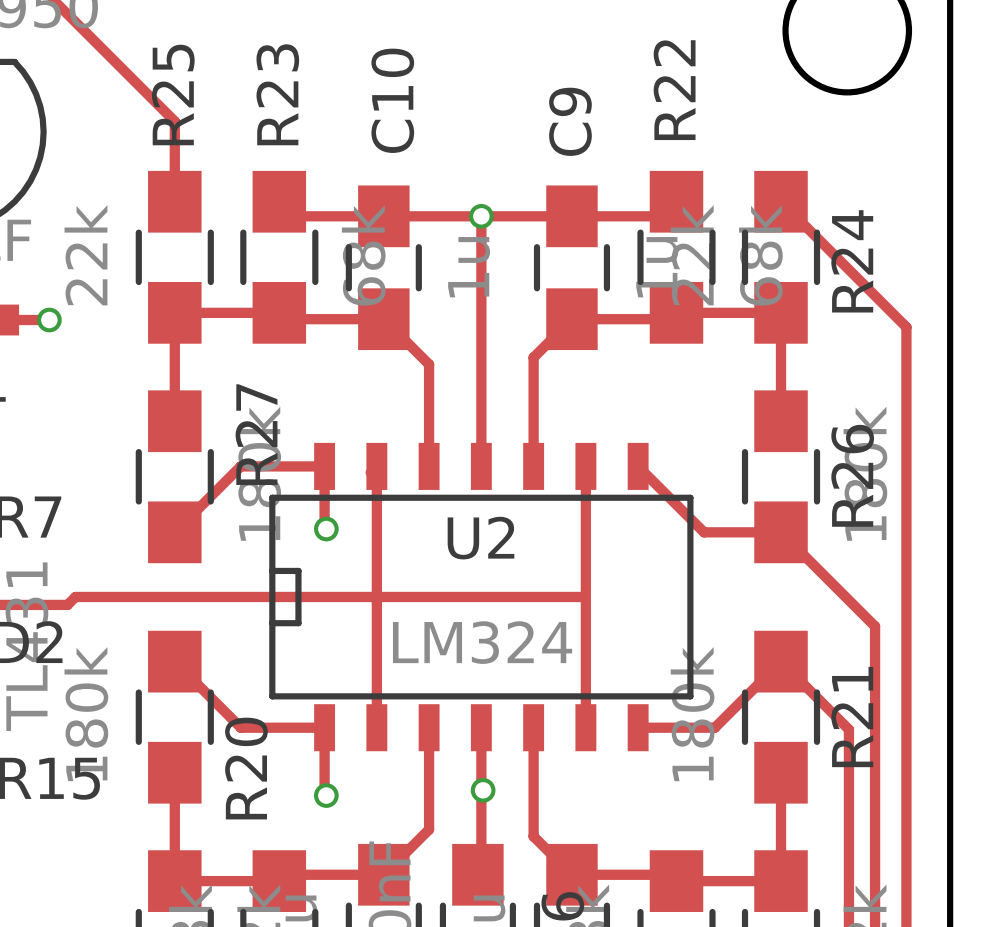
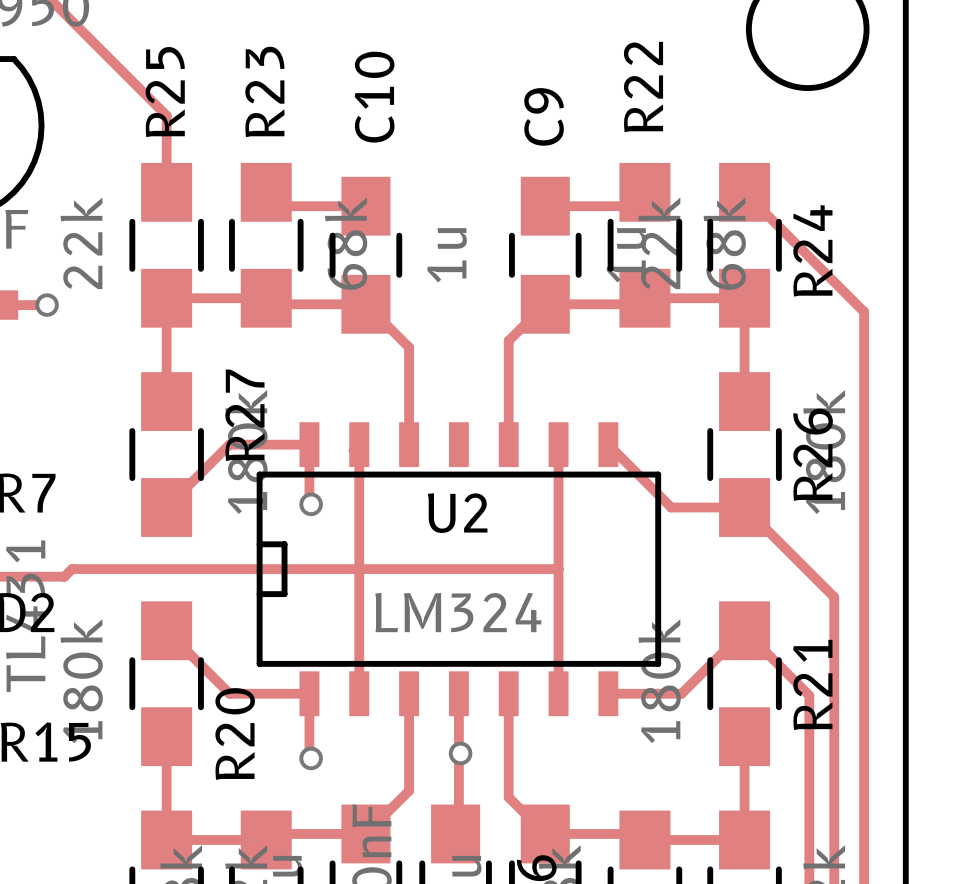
track: (477, 215) (481, 216) (481, 466) -> none
track: (383, 216) (571, 216) -> none
via: (481, 216) -> none

